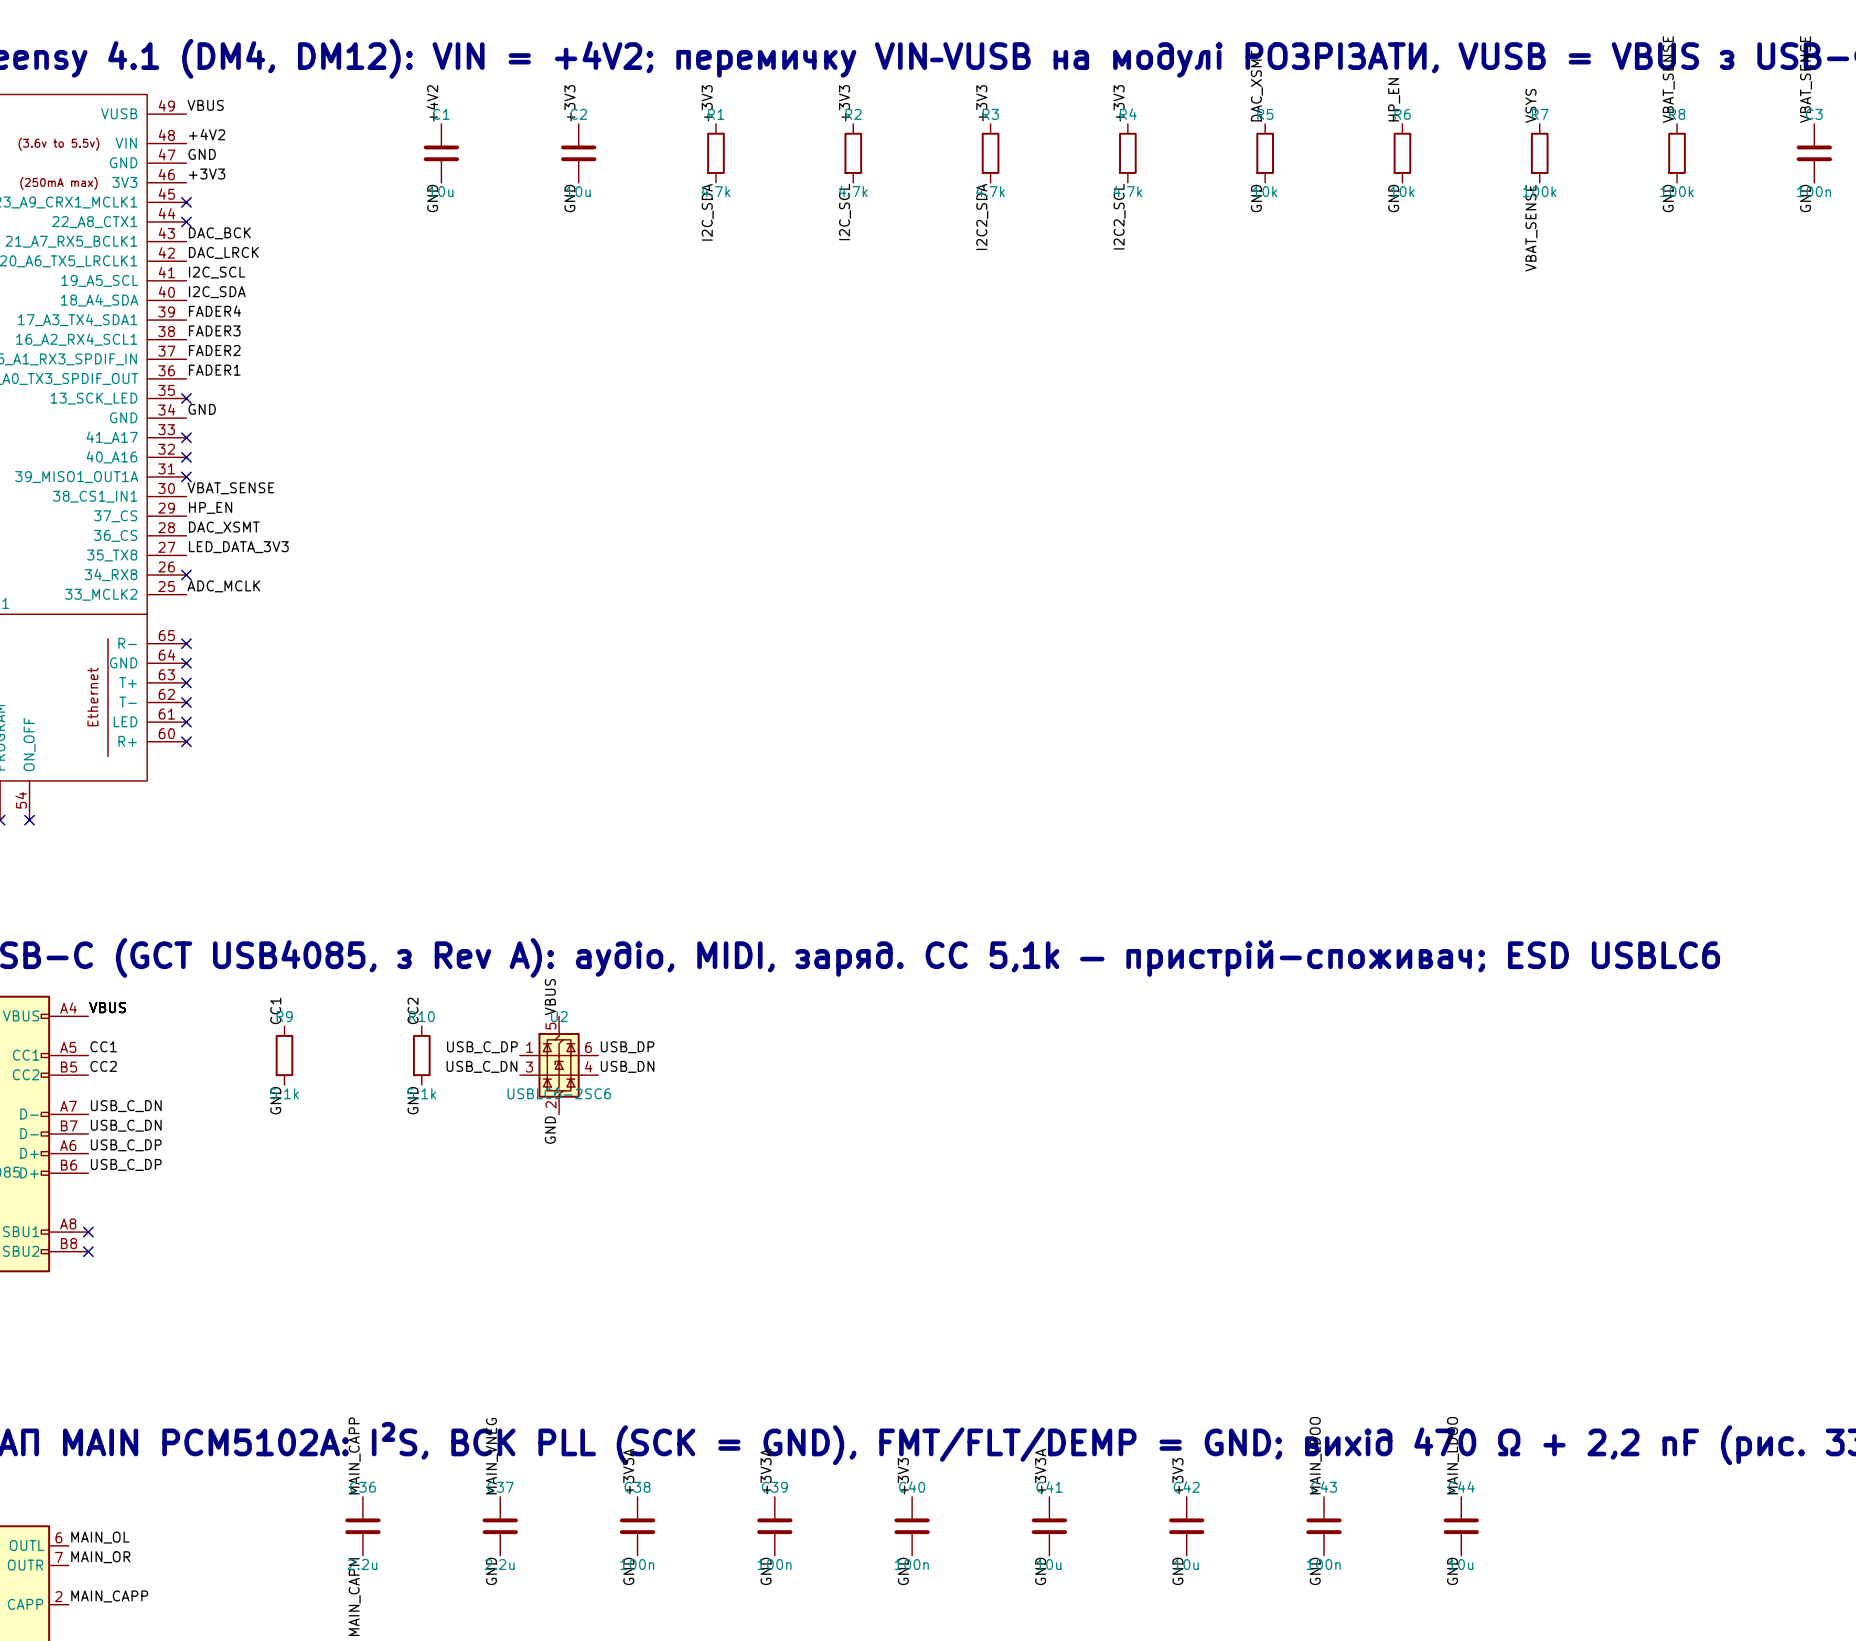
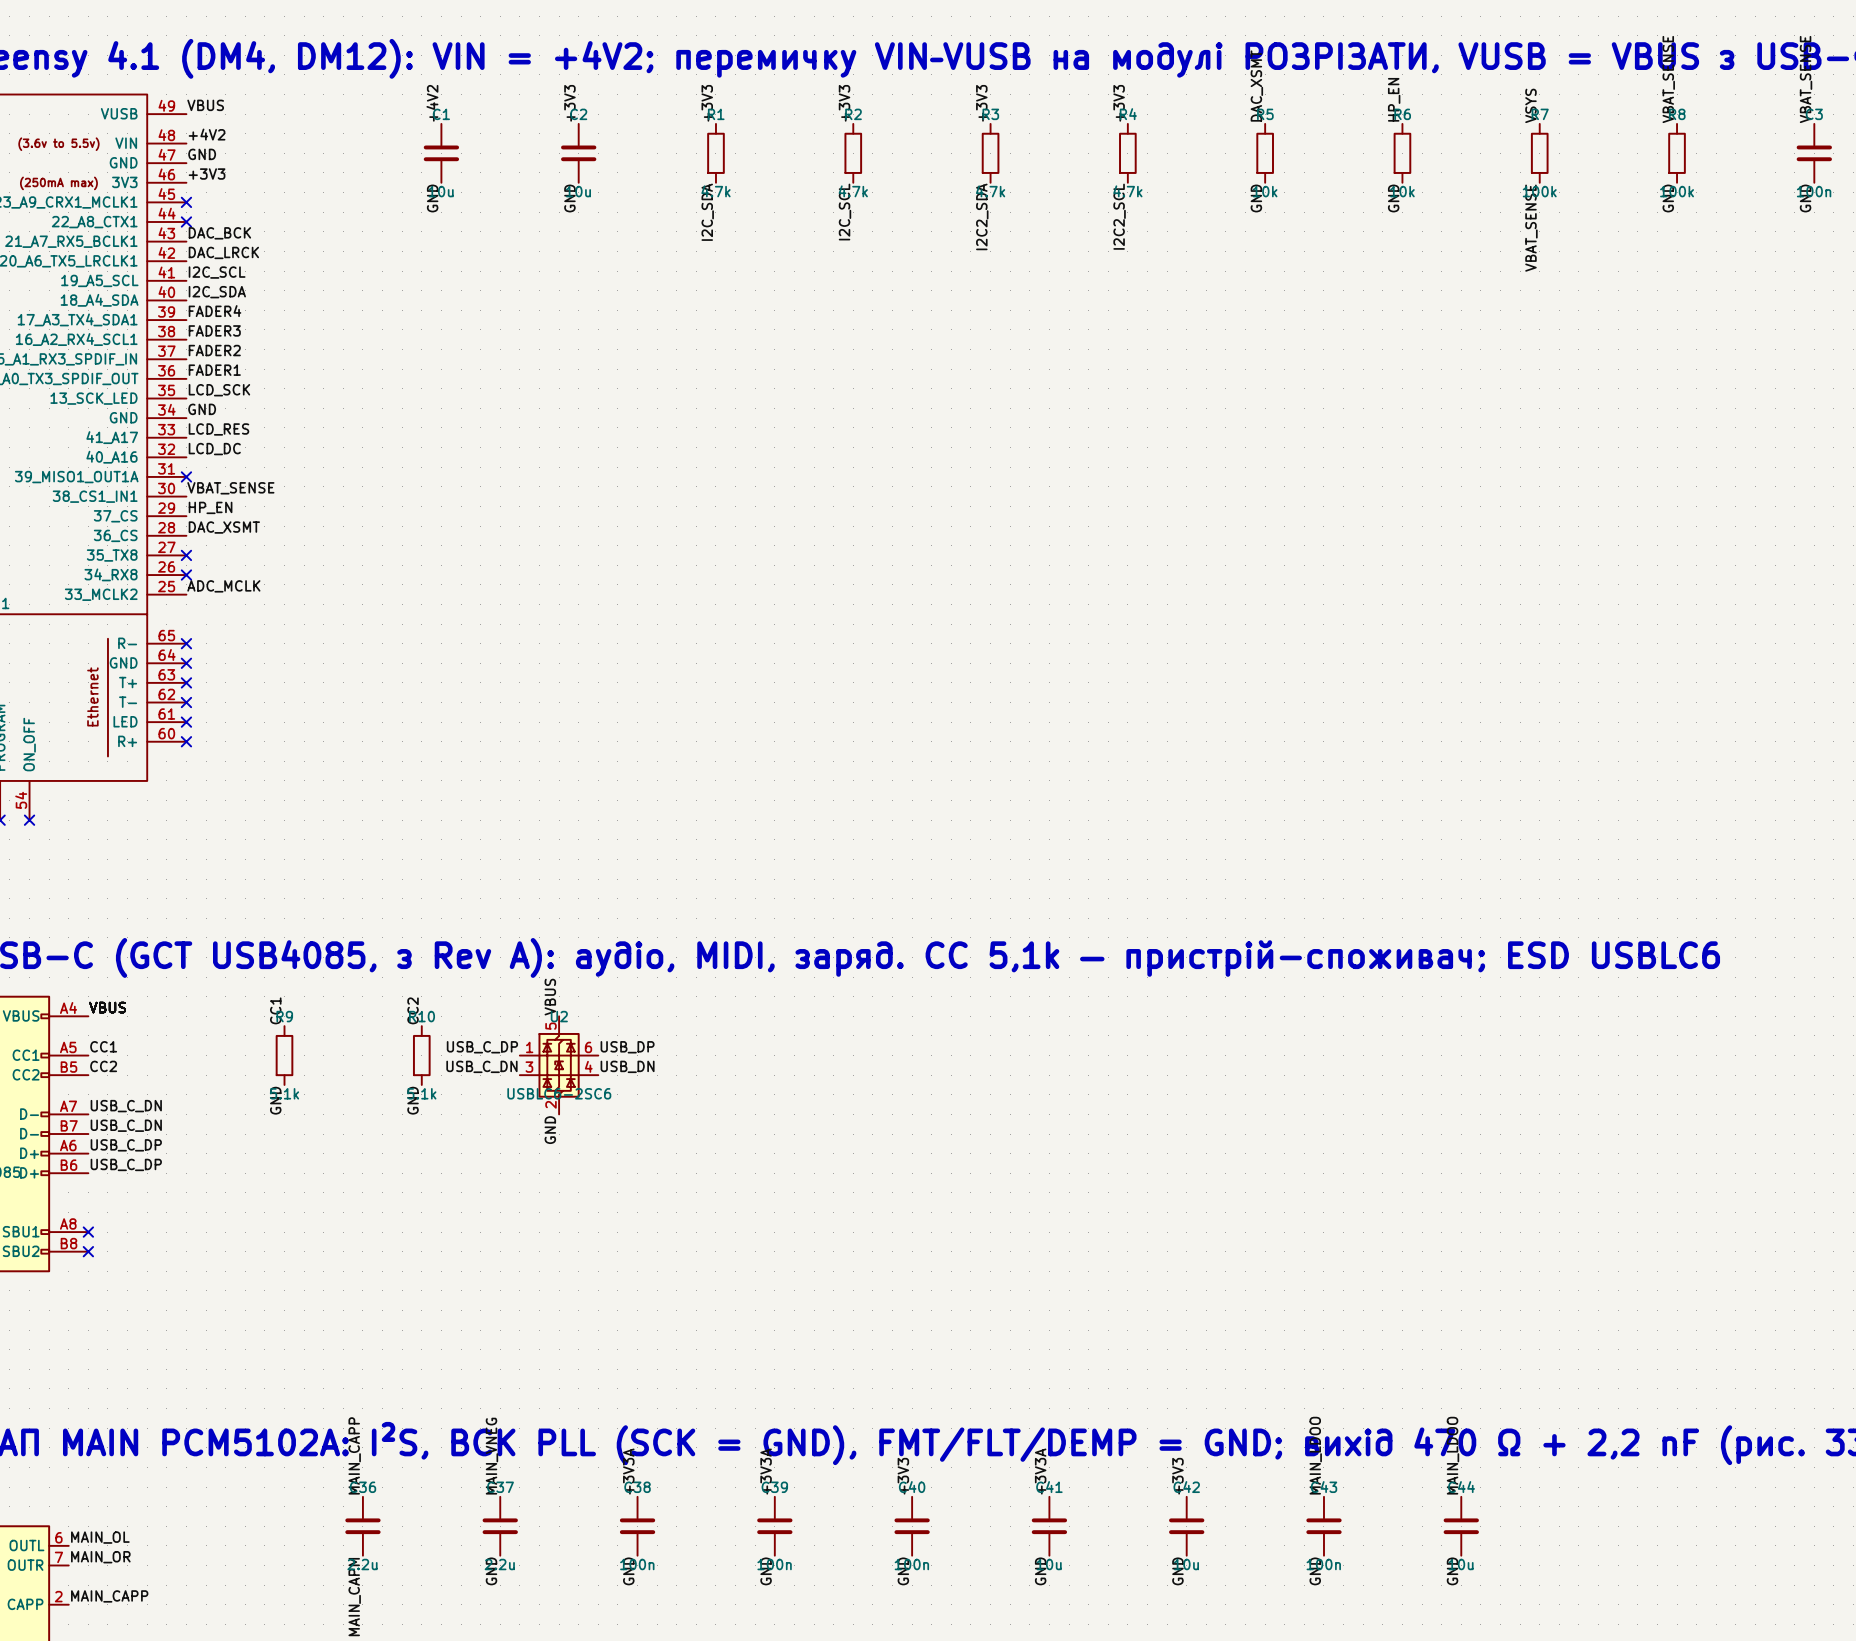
label: none -> LCD_SCK (219, 390)
no-connect mark: (186, 398) -> none
label: none -> LCD_RES (218, 429)
no-connect mark: (186, 437) -> none
label: none -> LCD_DC (214, 449)
no-connect mark: (186, 457) -> none
label: LED_DATA_3V3 (238, 547) -> none
no-connect mark: none -> (186, 555)

